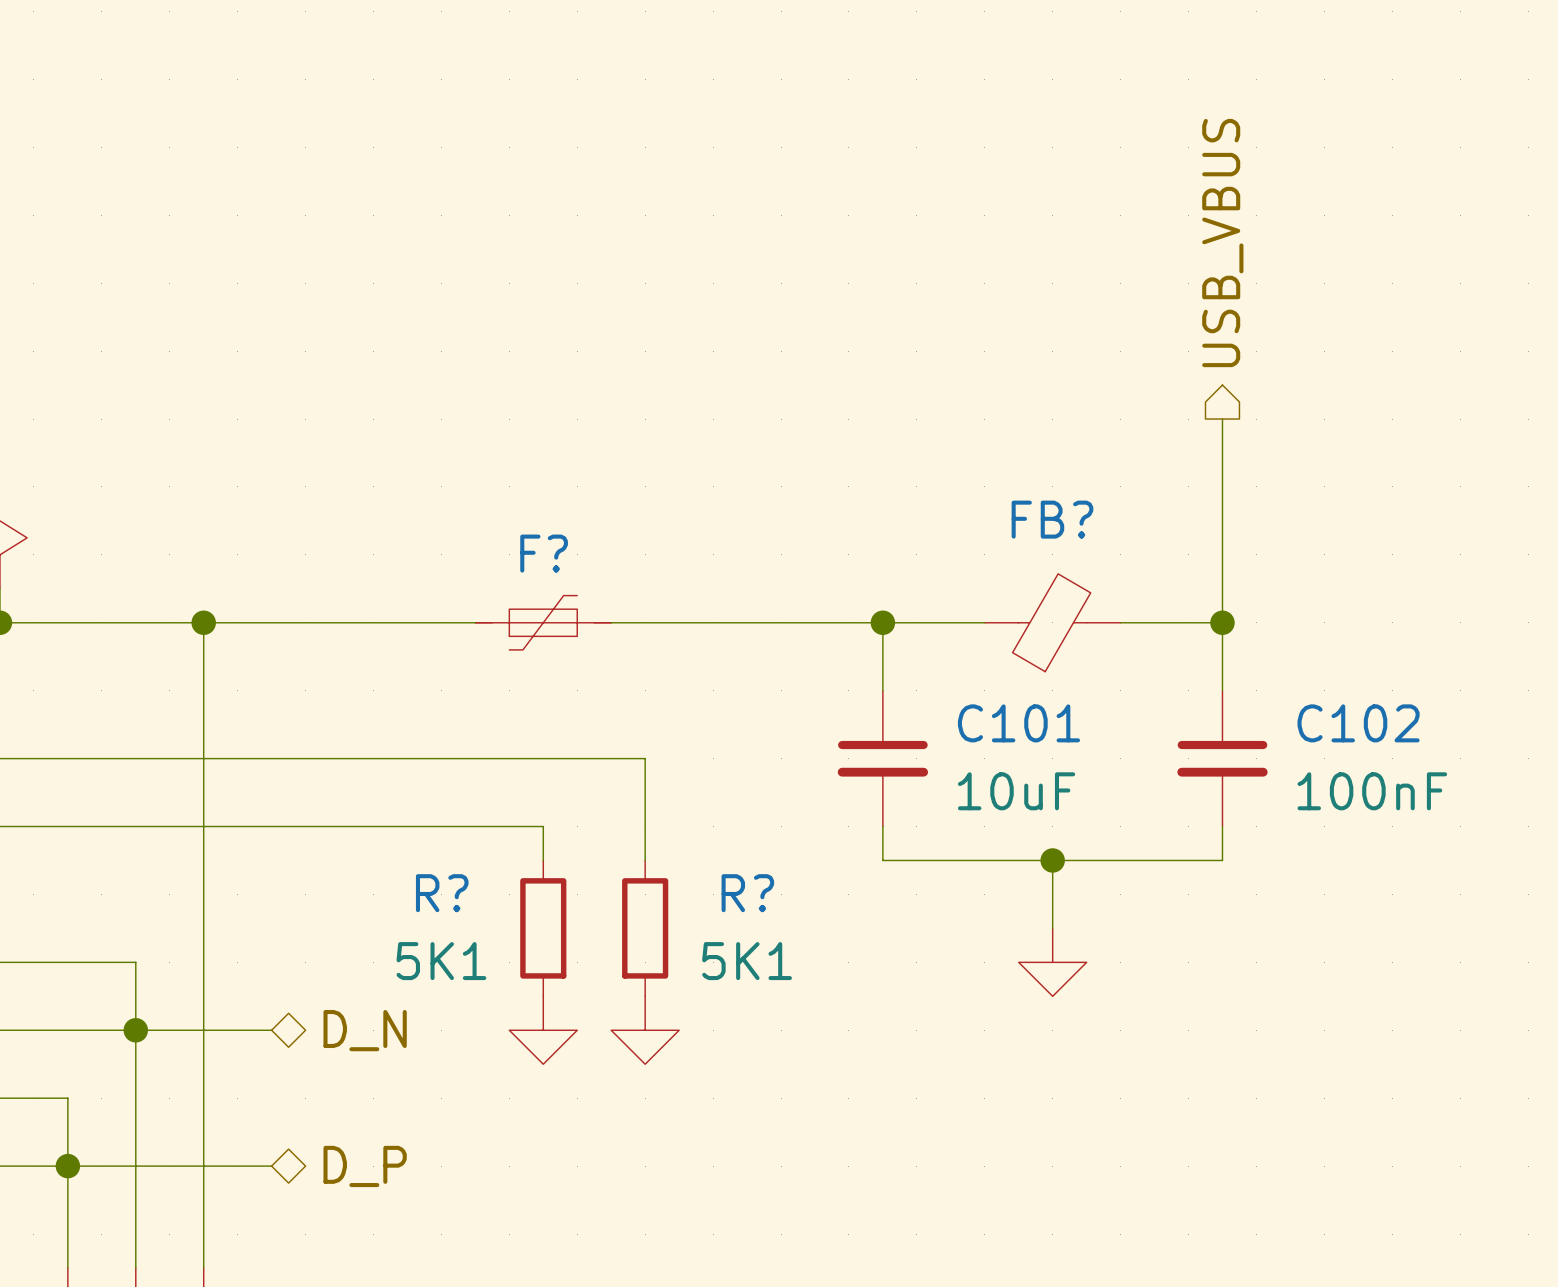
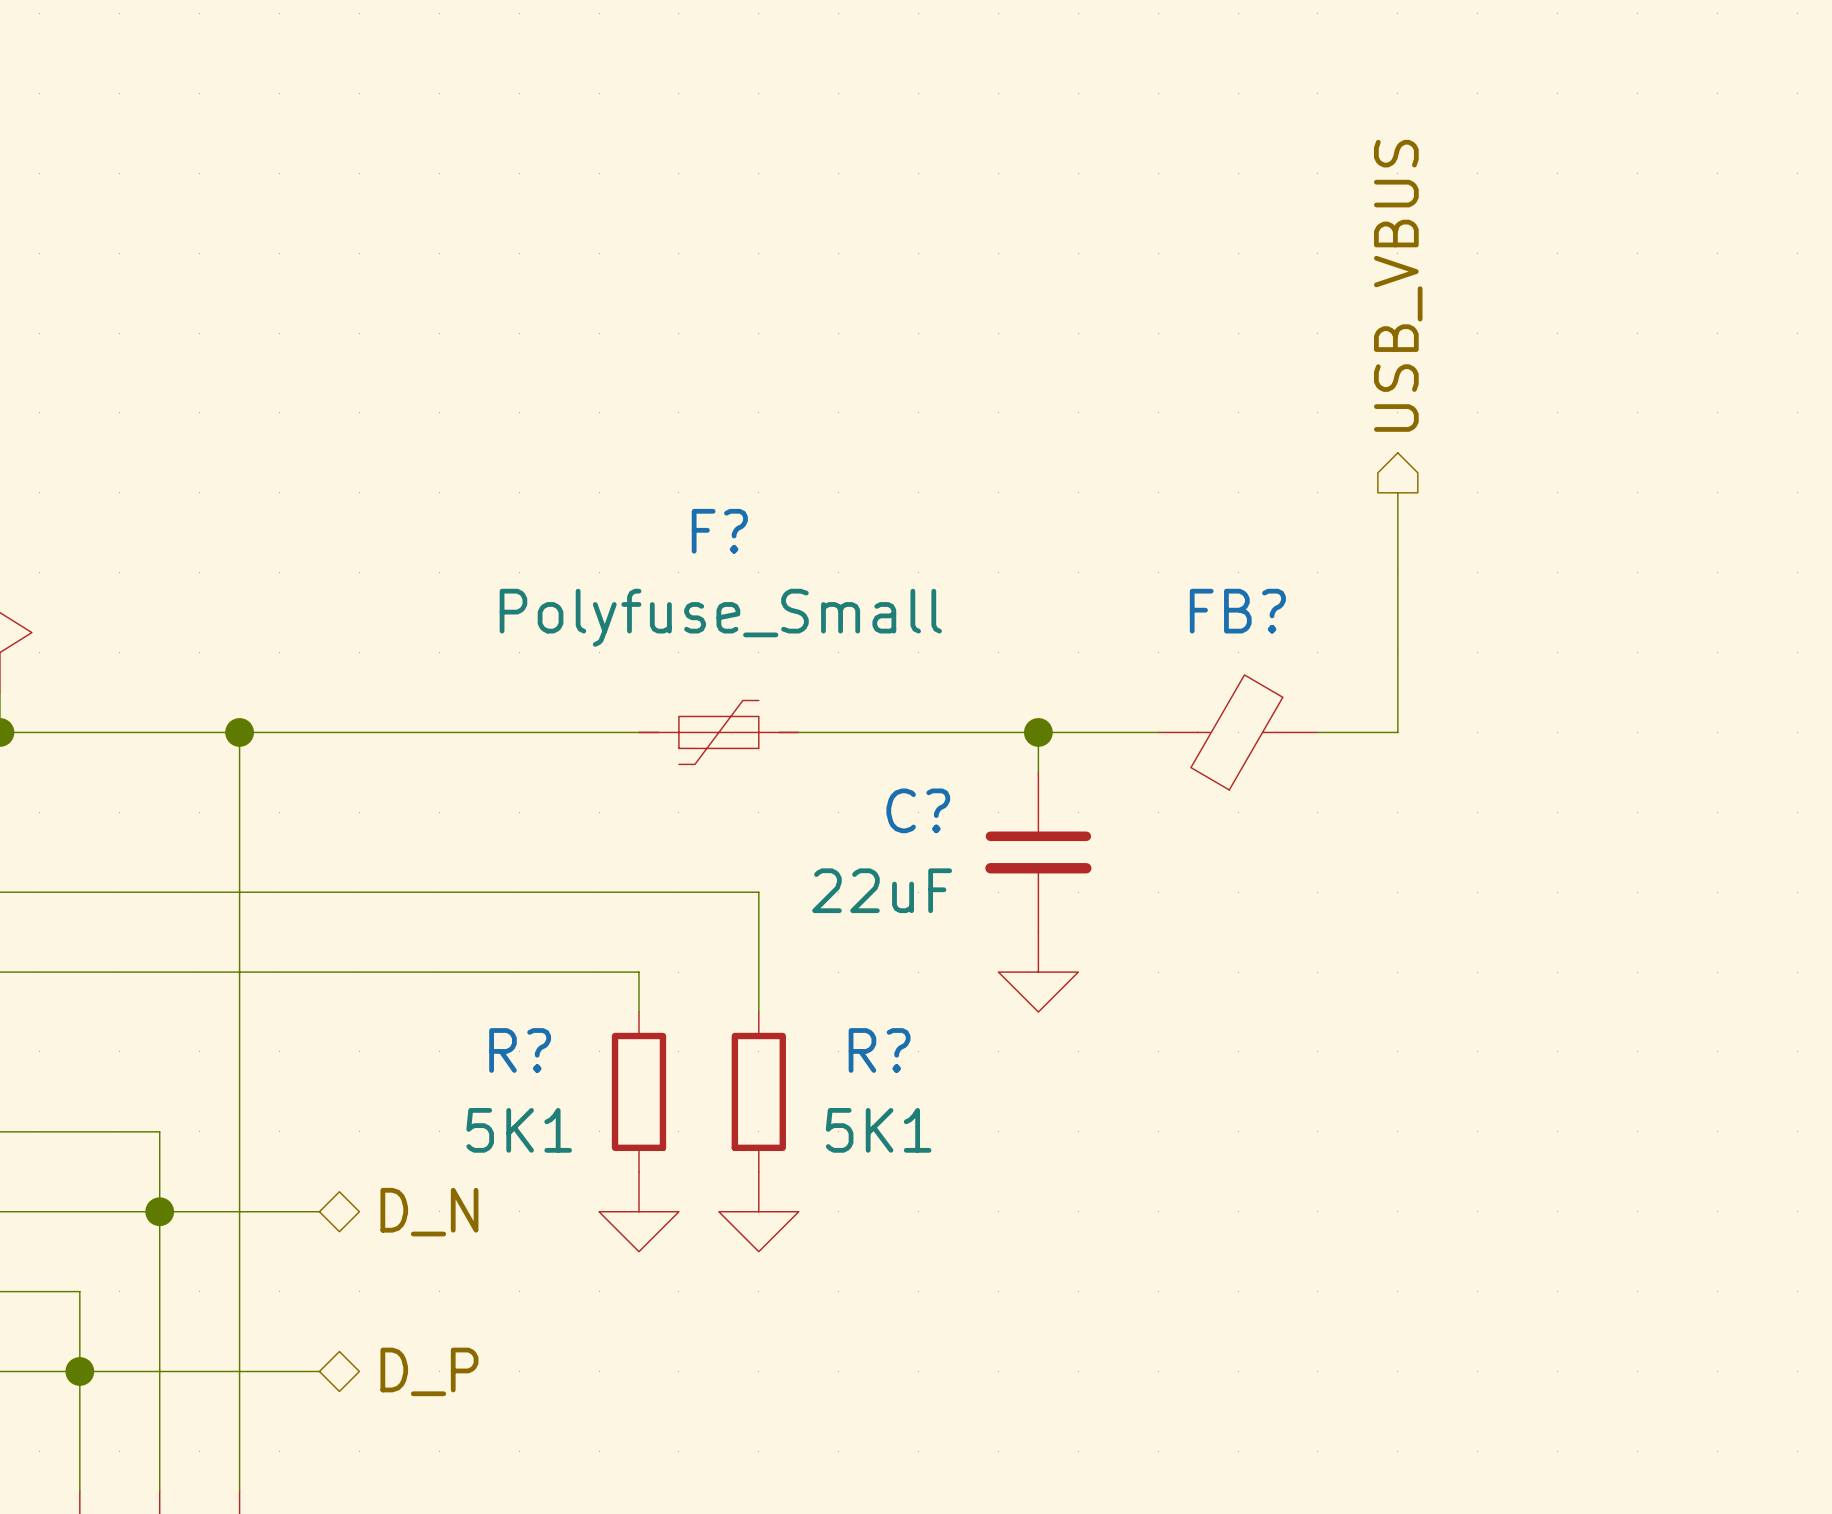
hierarchical label position: USB_VBUS (1222, 243) -> USB_VBUS (1398, 285)
wire: (1222, 419) (1222, 690) -> none
F?: (543, 622) -> none
F?: none -> Polyfuse_Small (718, 732)
wire: (1188, 622) (1222, 622) -> (1397, 732) (1397, 492)
junction: (1222, 622) -> none
C?: none -> 22uF (1038, 852)
C101: 10uF (882, 758) -> none
C102: 100nF (1222, 758) -> none
wire: (882, 826) (882, 860) (1222, 860) (1222, 826) -> none
wire: (1052, 860) (1052, 928) -> none
junction: (1052, 860) -> none
power symbol position: (1052, 962) -> (1038, 972)

